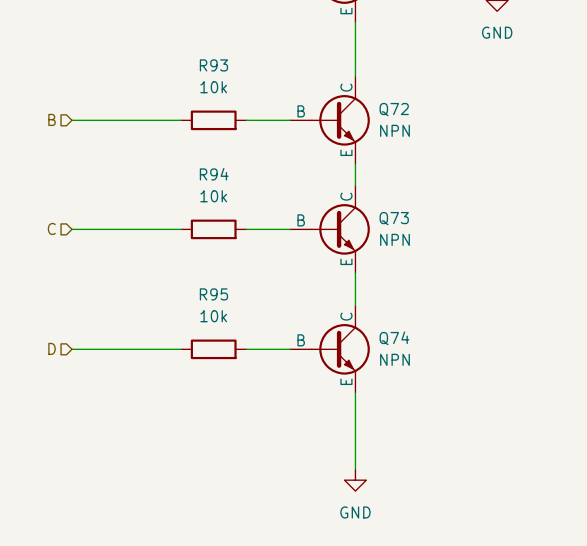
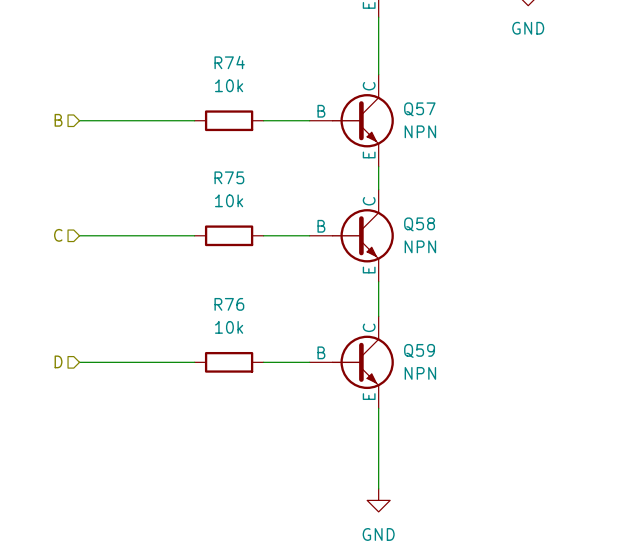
R93 name: R93 (213, 65) -> R74 (229, 62)
Q72 name: Q72 (394, 109) -> Q57 (419, 109)
R94 name: R94 (214, 174) -> R75 (229, 177)
Q73 name: Q73 (394, 218) -> Q58 (419, 224)
R95 name: R95 (213, 294) -> R76 (229, 304)
Q74 name: Q74 (394, 338) -> Q59 (419, 350)

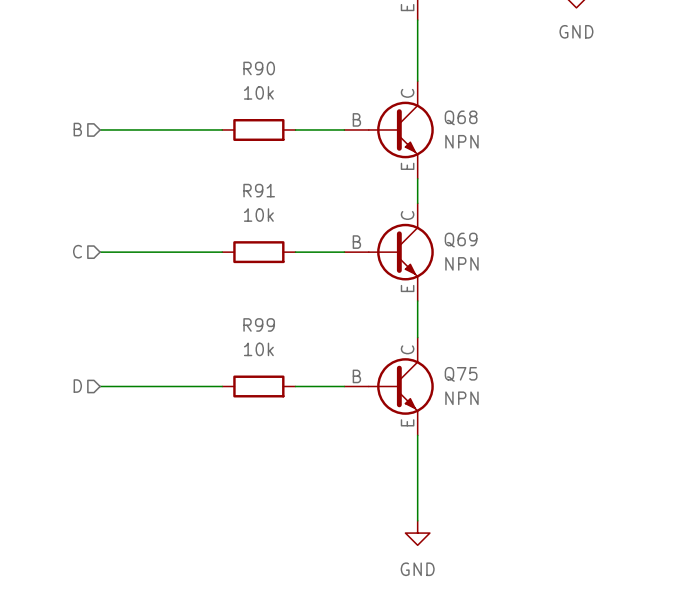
R74 name: R74 (229, 62) -> R90 (259, 68)
Q57 name: Q57 (419, 109) -> Q68 (461, 117)
R75 name: R75 (229, 177) -> R91 (259, 190)
Q58 name: Q58 (419, 224) -> Q69 (461, 240)
R76 name: R76 (229, 304) -> R99 (259, 324)
Q59 name: Q59 (419, 350) -> Q75 (461, 374)

